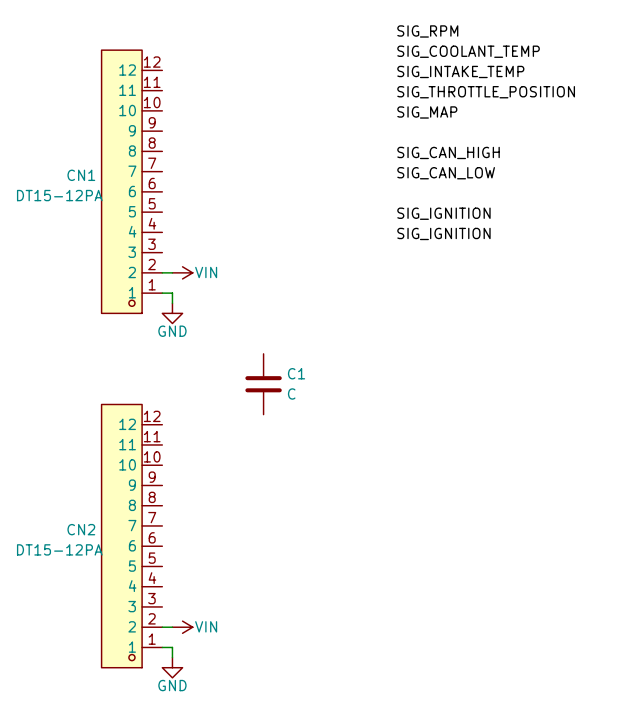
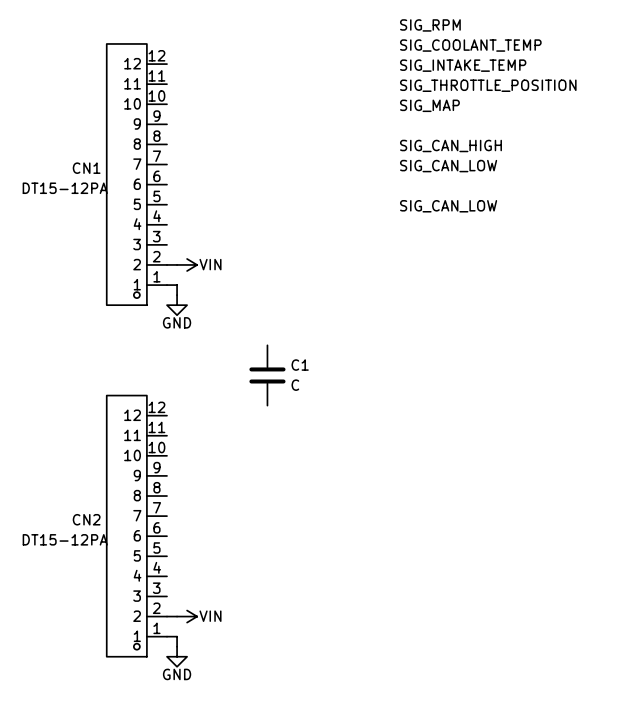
label: SIG_IGNITION (443, 213) -> SIG_CAN_LOW (448, 206)
label: SIG_IGNITION (443, 233) -> none

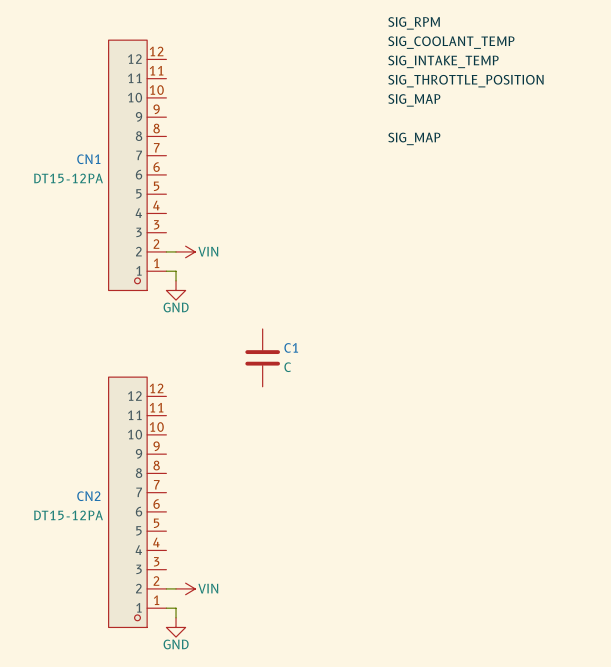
label: SIG_CAN_HIGH (450, 145) -> SIG_MAP (414, 138)
label: SIG_CAN_LOW (448, 166) -> none
label: SIG_CAN_LOW (448, 206) -> none

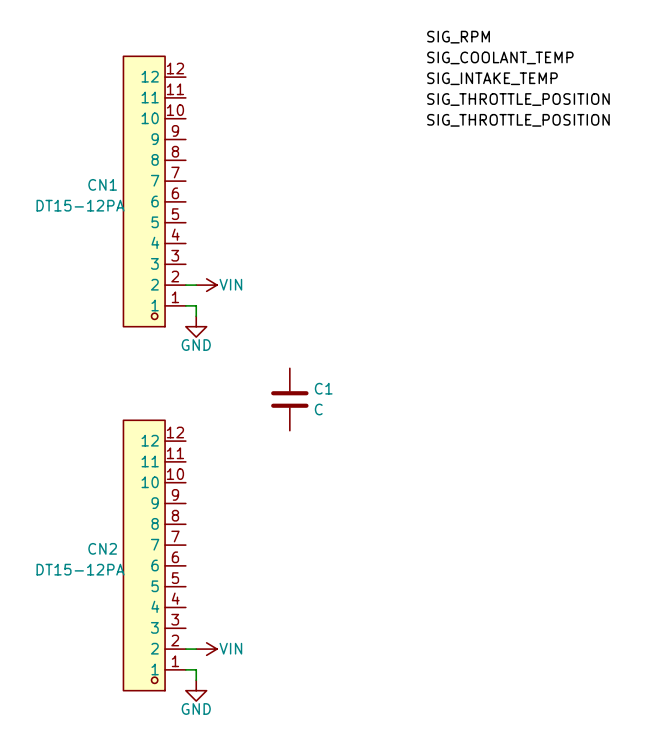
label: SIG_MAP (414, 100) -> SIG_THROTTLE_POSITION (518, 120)
label: SIG_MAP (414, 138) -> none

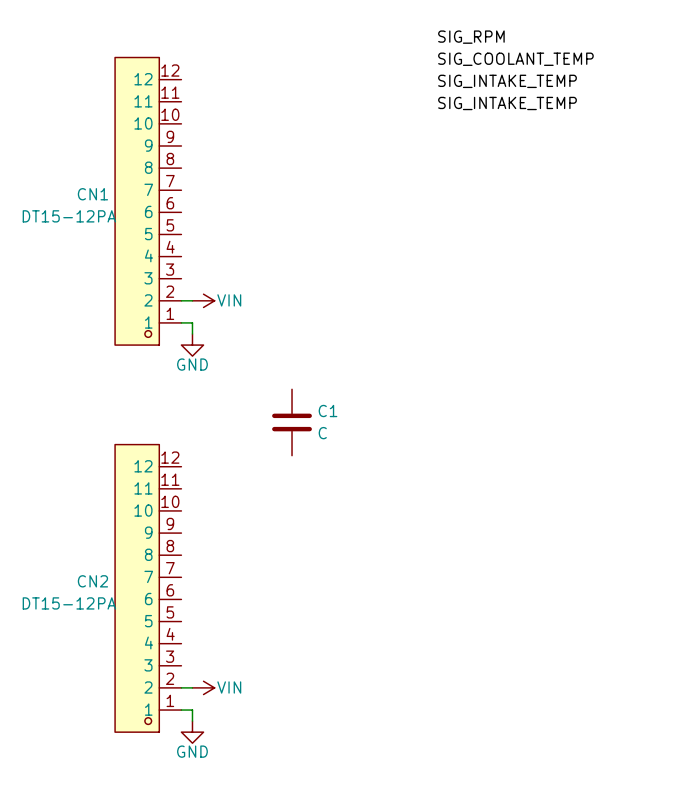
label: SIG_THROTTLE_POSITION (518, 99) -> SIG_INTAKE_TEMP (507, 103)
label: SIG_THROTTLE_POSITION (518, 120) -> none

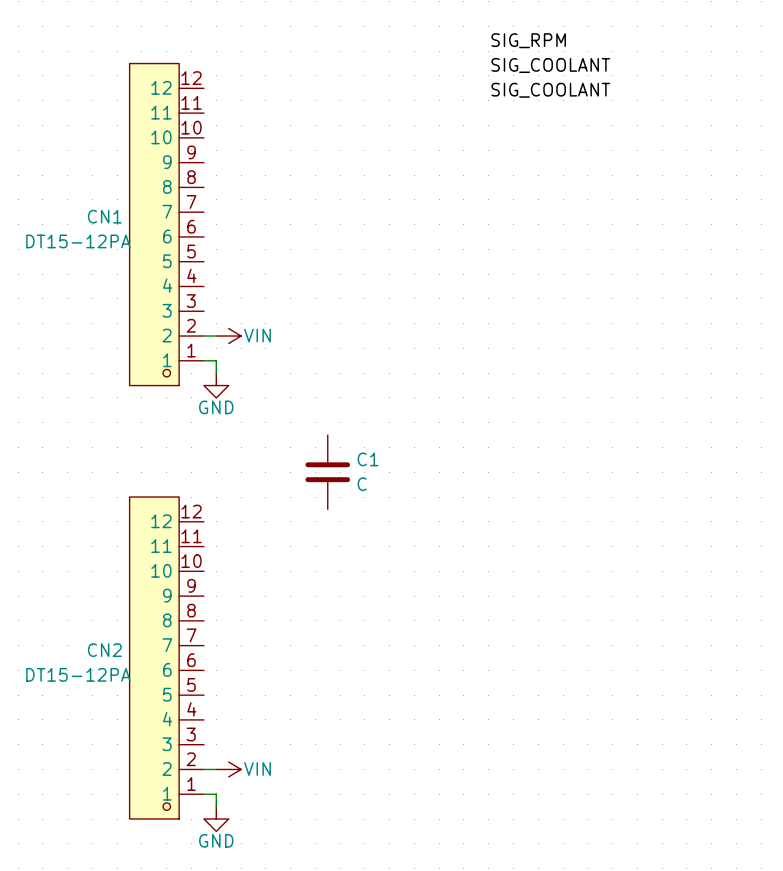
label: SIG_COOLANT_TEMP (515, 59) -> SIG_COOLANT (550, 65)
label: SIG_INTAKE_TEMP (507, 81) -> SIG_COOLANT (550, 90)
label: SIG_INTAKE_TEMP (507, 103) -> none

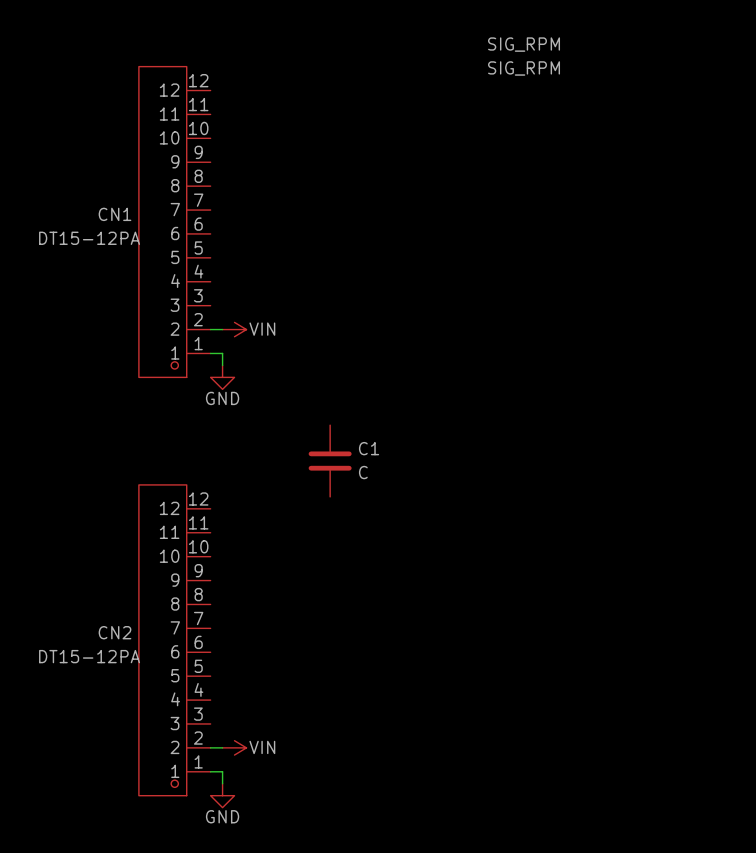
label: SIG_COOLANT (550, 65) -> SIG_RPM (524, 68)
label: SIG_COOLANT (550, 90) -> none

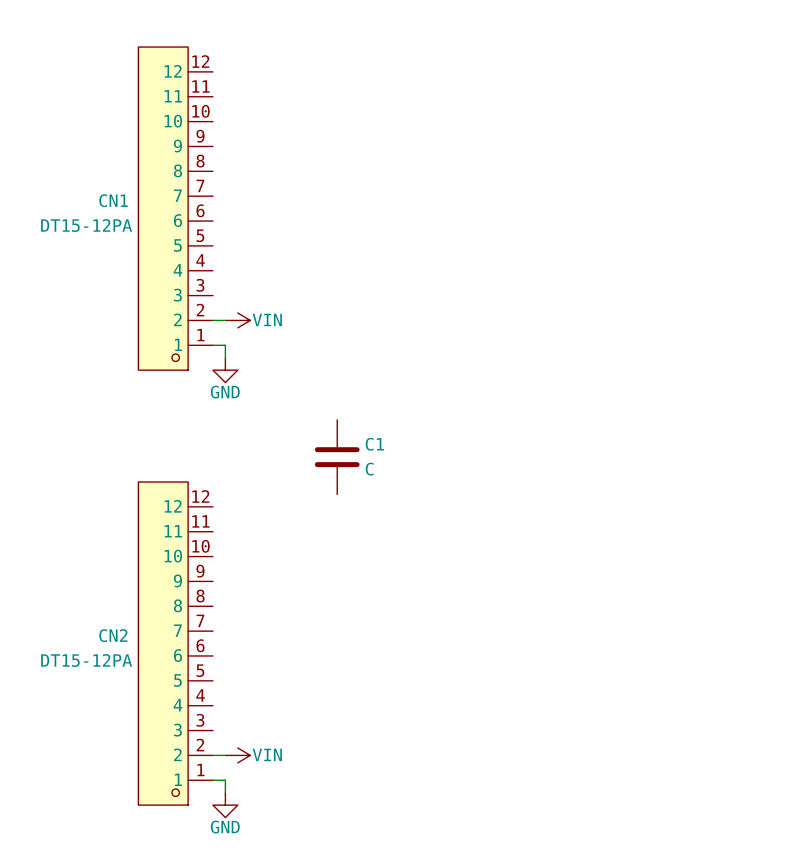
label: SIG_RPM (524, 44) -> none
label: SIG_RPM (524, 68) -> none

